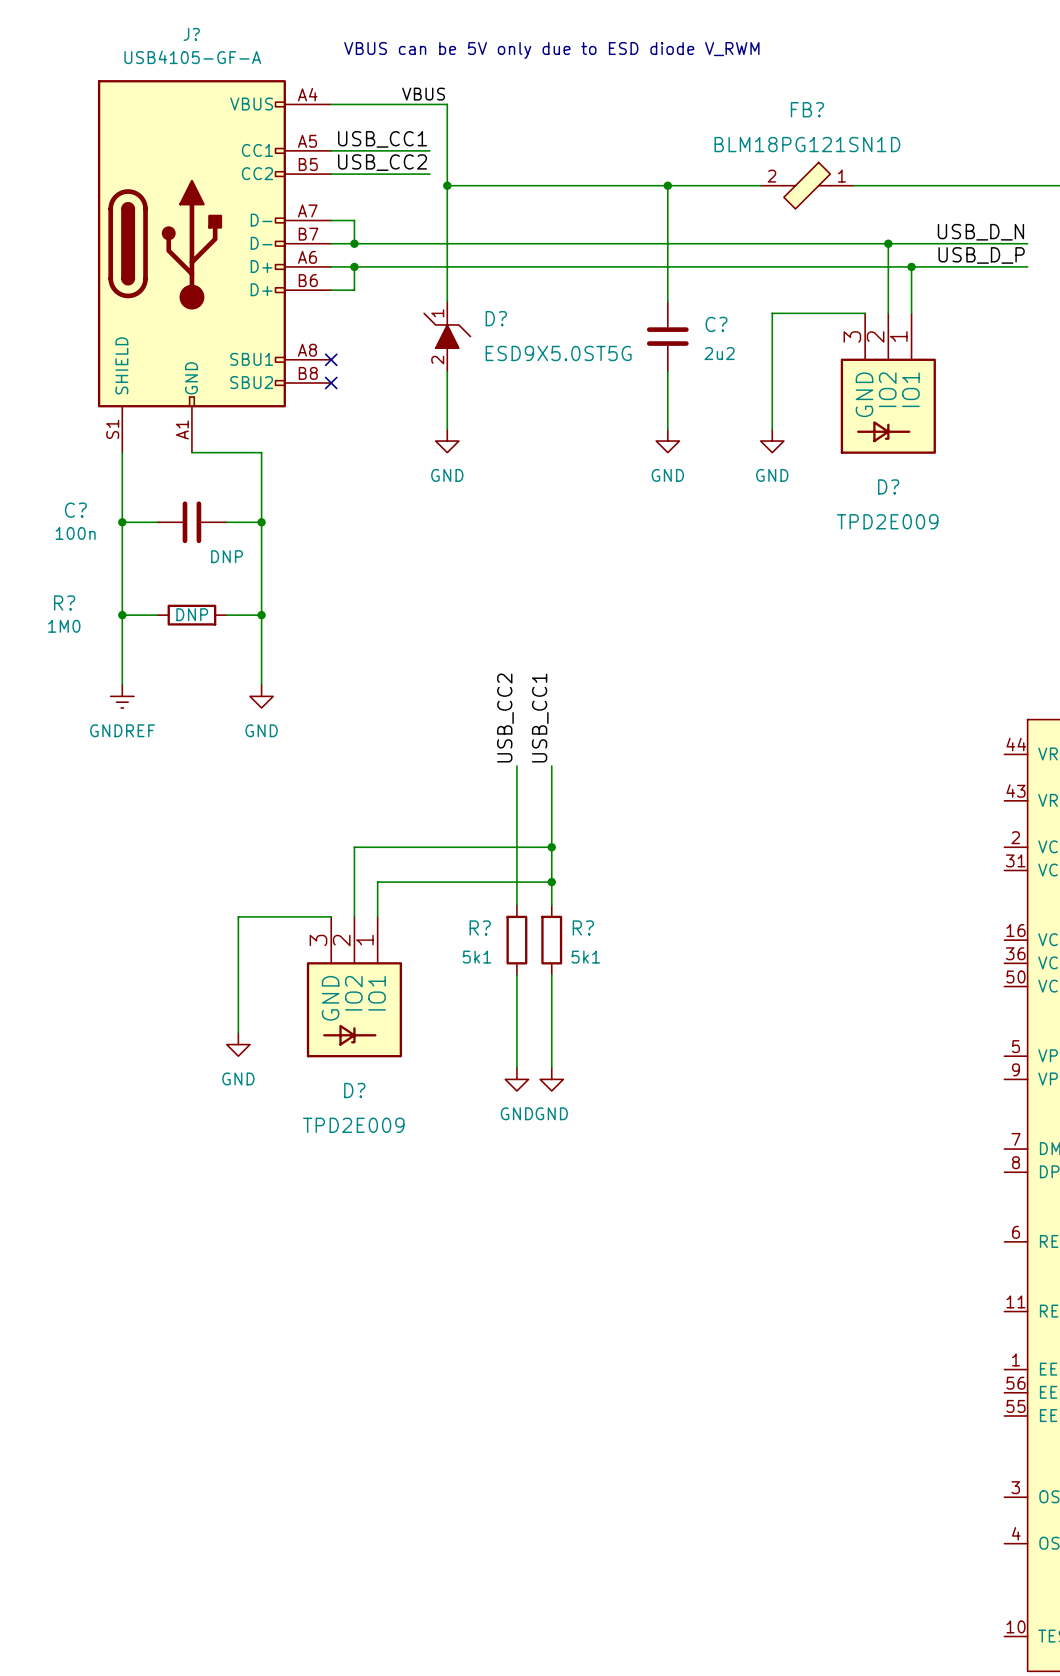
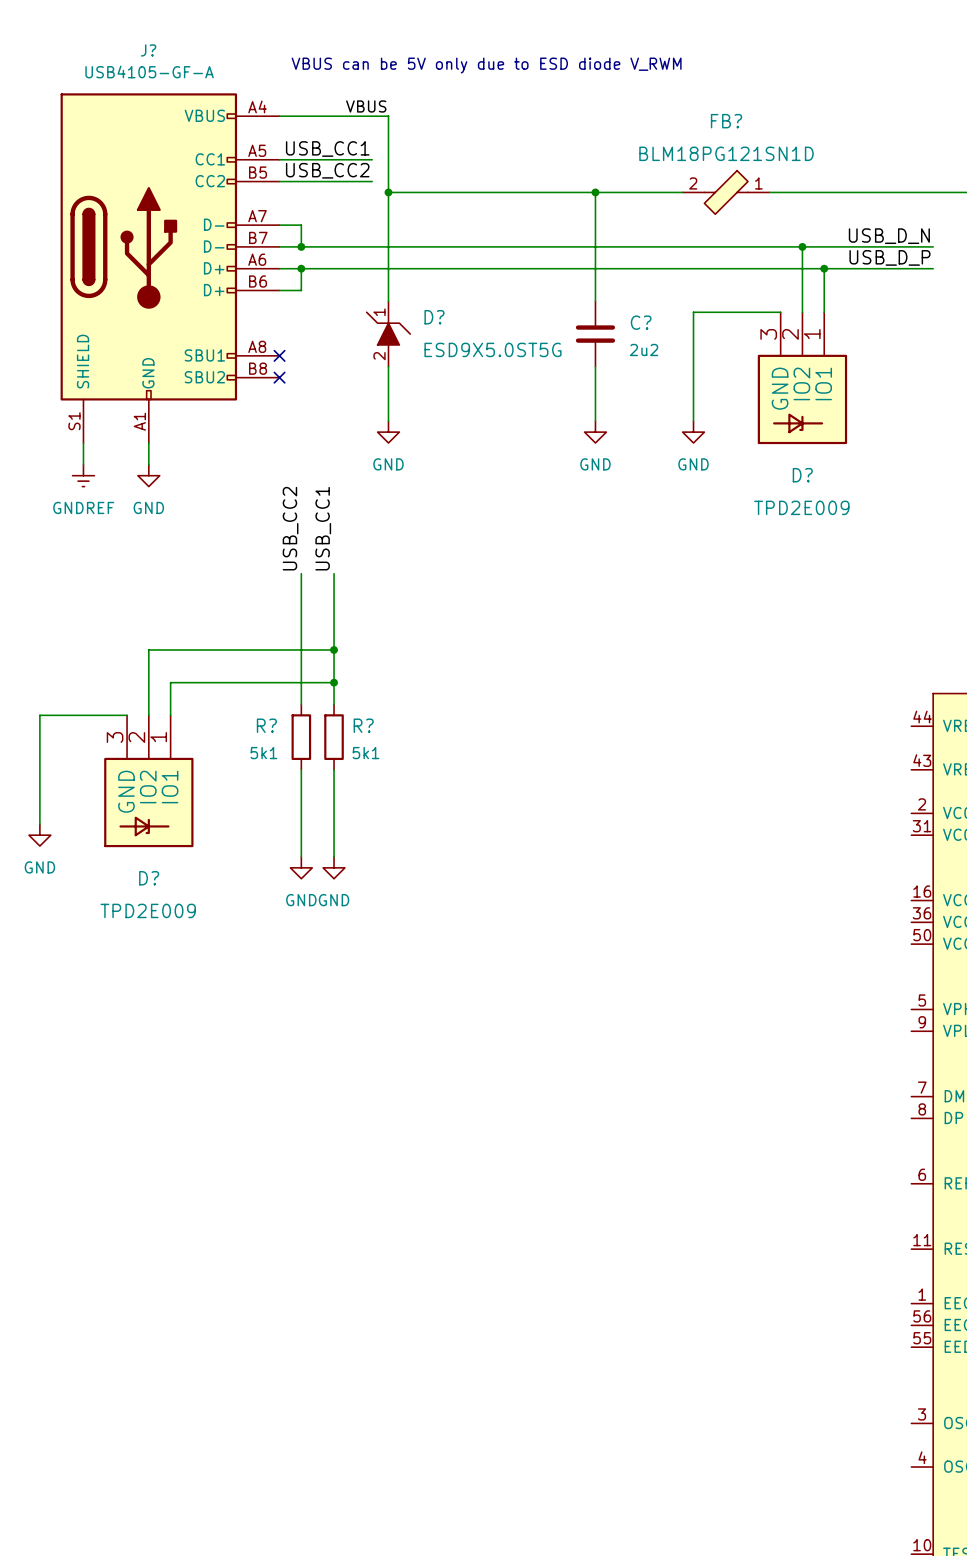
wire: (191, 452) (261, 452) (261, 684) -> (148, 443) (148, 464)
wire: (122, 475) (122, 684) -> none
power symbol: none -> GND (148, 475)
wire: (122, 522) (157, 522) -> none
junction: (122, 522) -> none
C?: (191, 522) -> none
wire: (226, 522) (261, 522) -> none
junction: (261, 522) -> none
label: none -> USB_CC2 (290, 528)
label: none -> USB_CC1 (323, 528)
wire: none -> (301, 573) (301, 704)
wire: (122, 615) (157, 615) -> none
junction: (122, 615) -> none
R?: (191, 615) -> none
wire: (226, 615) (261, 615) -> none
junction: (261, 615) -> none
wire: none -> (334, 649) (148, 649) (148, 715)
junction: none -> (334, 649)
power symbol position: GNDREF (122, 696) -> GNDREF (83, 475)
power symbol: GND (261, 696) -> none
wire: none -> (334, 682) (170, 682) (170, 715)
junction: none -> (334, 682)
label: USB_CC2 (505, 718) -> none
label: USB_CC1 (540, 718) -> none
wire: none -> (127, 715) (39, 715) (39, 824)
R?: none -> (301, 737)
R?: none -> (334, 737)
wire: (516, 766) (516, 905) -> (334, 573) (334, 704)
wire: (551, 766) (551, 905) -> none
D?: none -> TPD2E009 (148, 781)
wire: (354, 847) (551, 847) -> (301, 813) (301, 769)
junction: (551, 847) -> none
power symbol: none -> GND (39, 835)
wire: (551, 882) (377, 882) (377, 916) -> none
junction: (551, 882) -> none
power symbol: none -> GND (301, 867)
power symbol: none -> GND (334, 867)
wire: (331, 916) (238, 916) (238, 1032) -> none
R?: (516, 940) -> none
R?: (551, 940) -> none
wire: (516, 974) (516, 1067) -> (334, 769) (334, 856)
wire: (551, 974) (551, 1067) -> none
D?: TPD2E009 (354, 987) -> none
power symbol: GND (238, 1044) -> none
power symbol: GND (516, 1079) -> none
power symbol: GND (551, 1079) -> none

